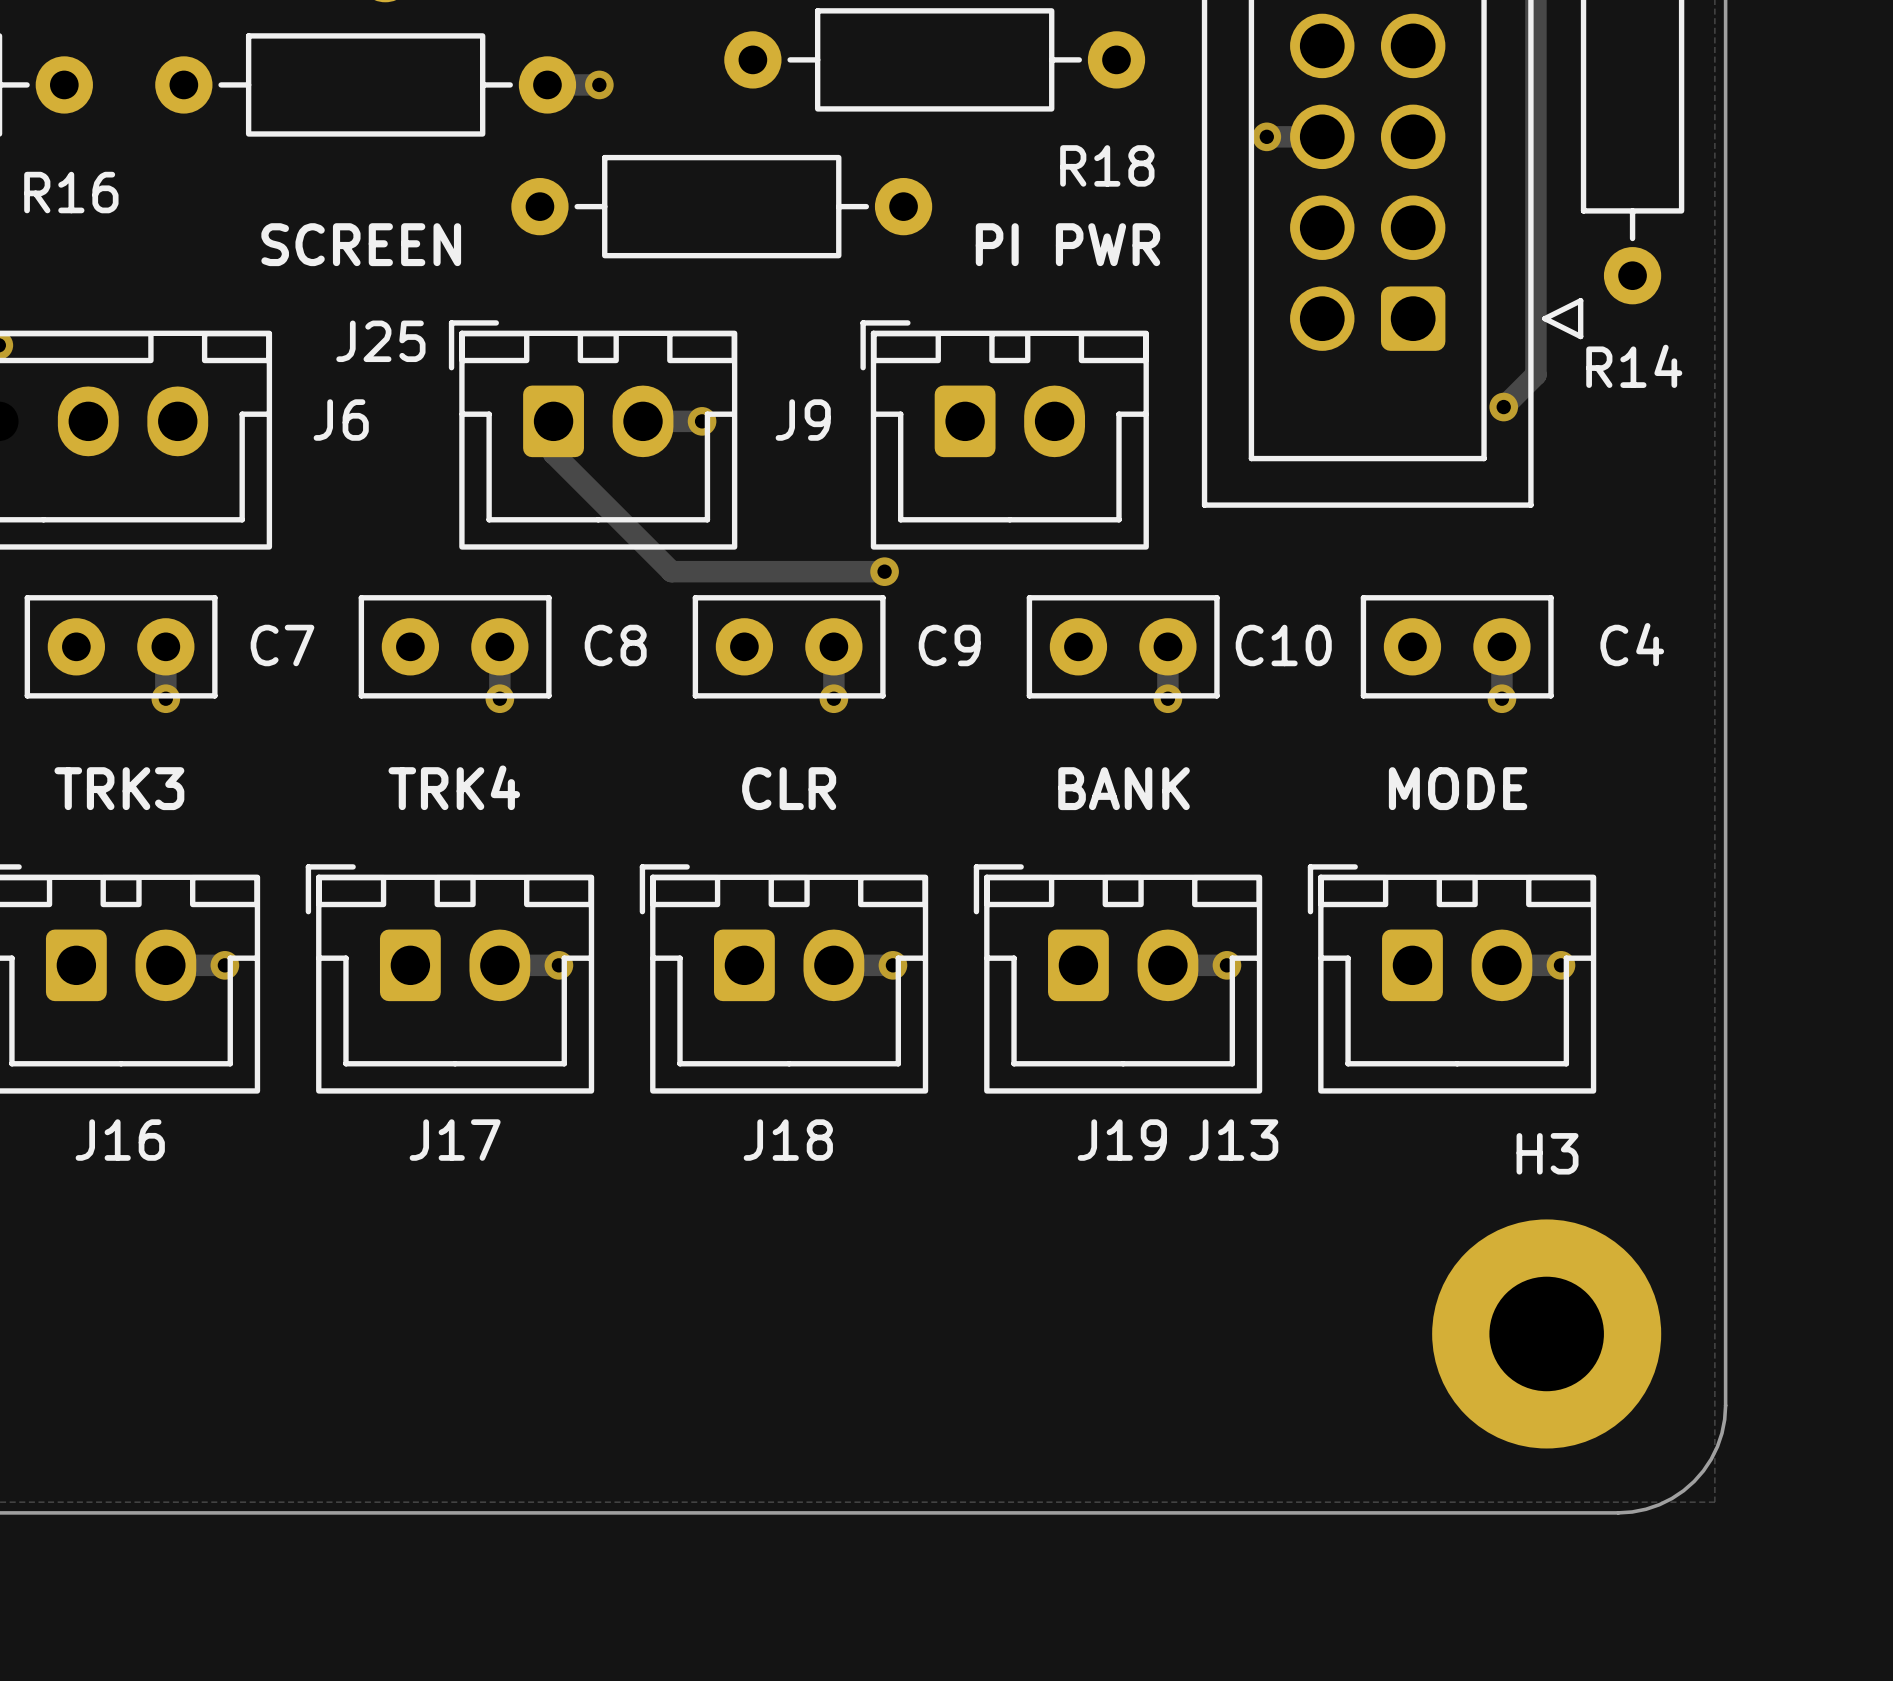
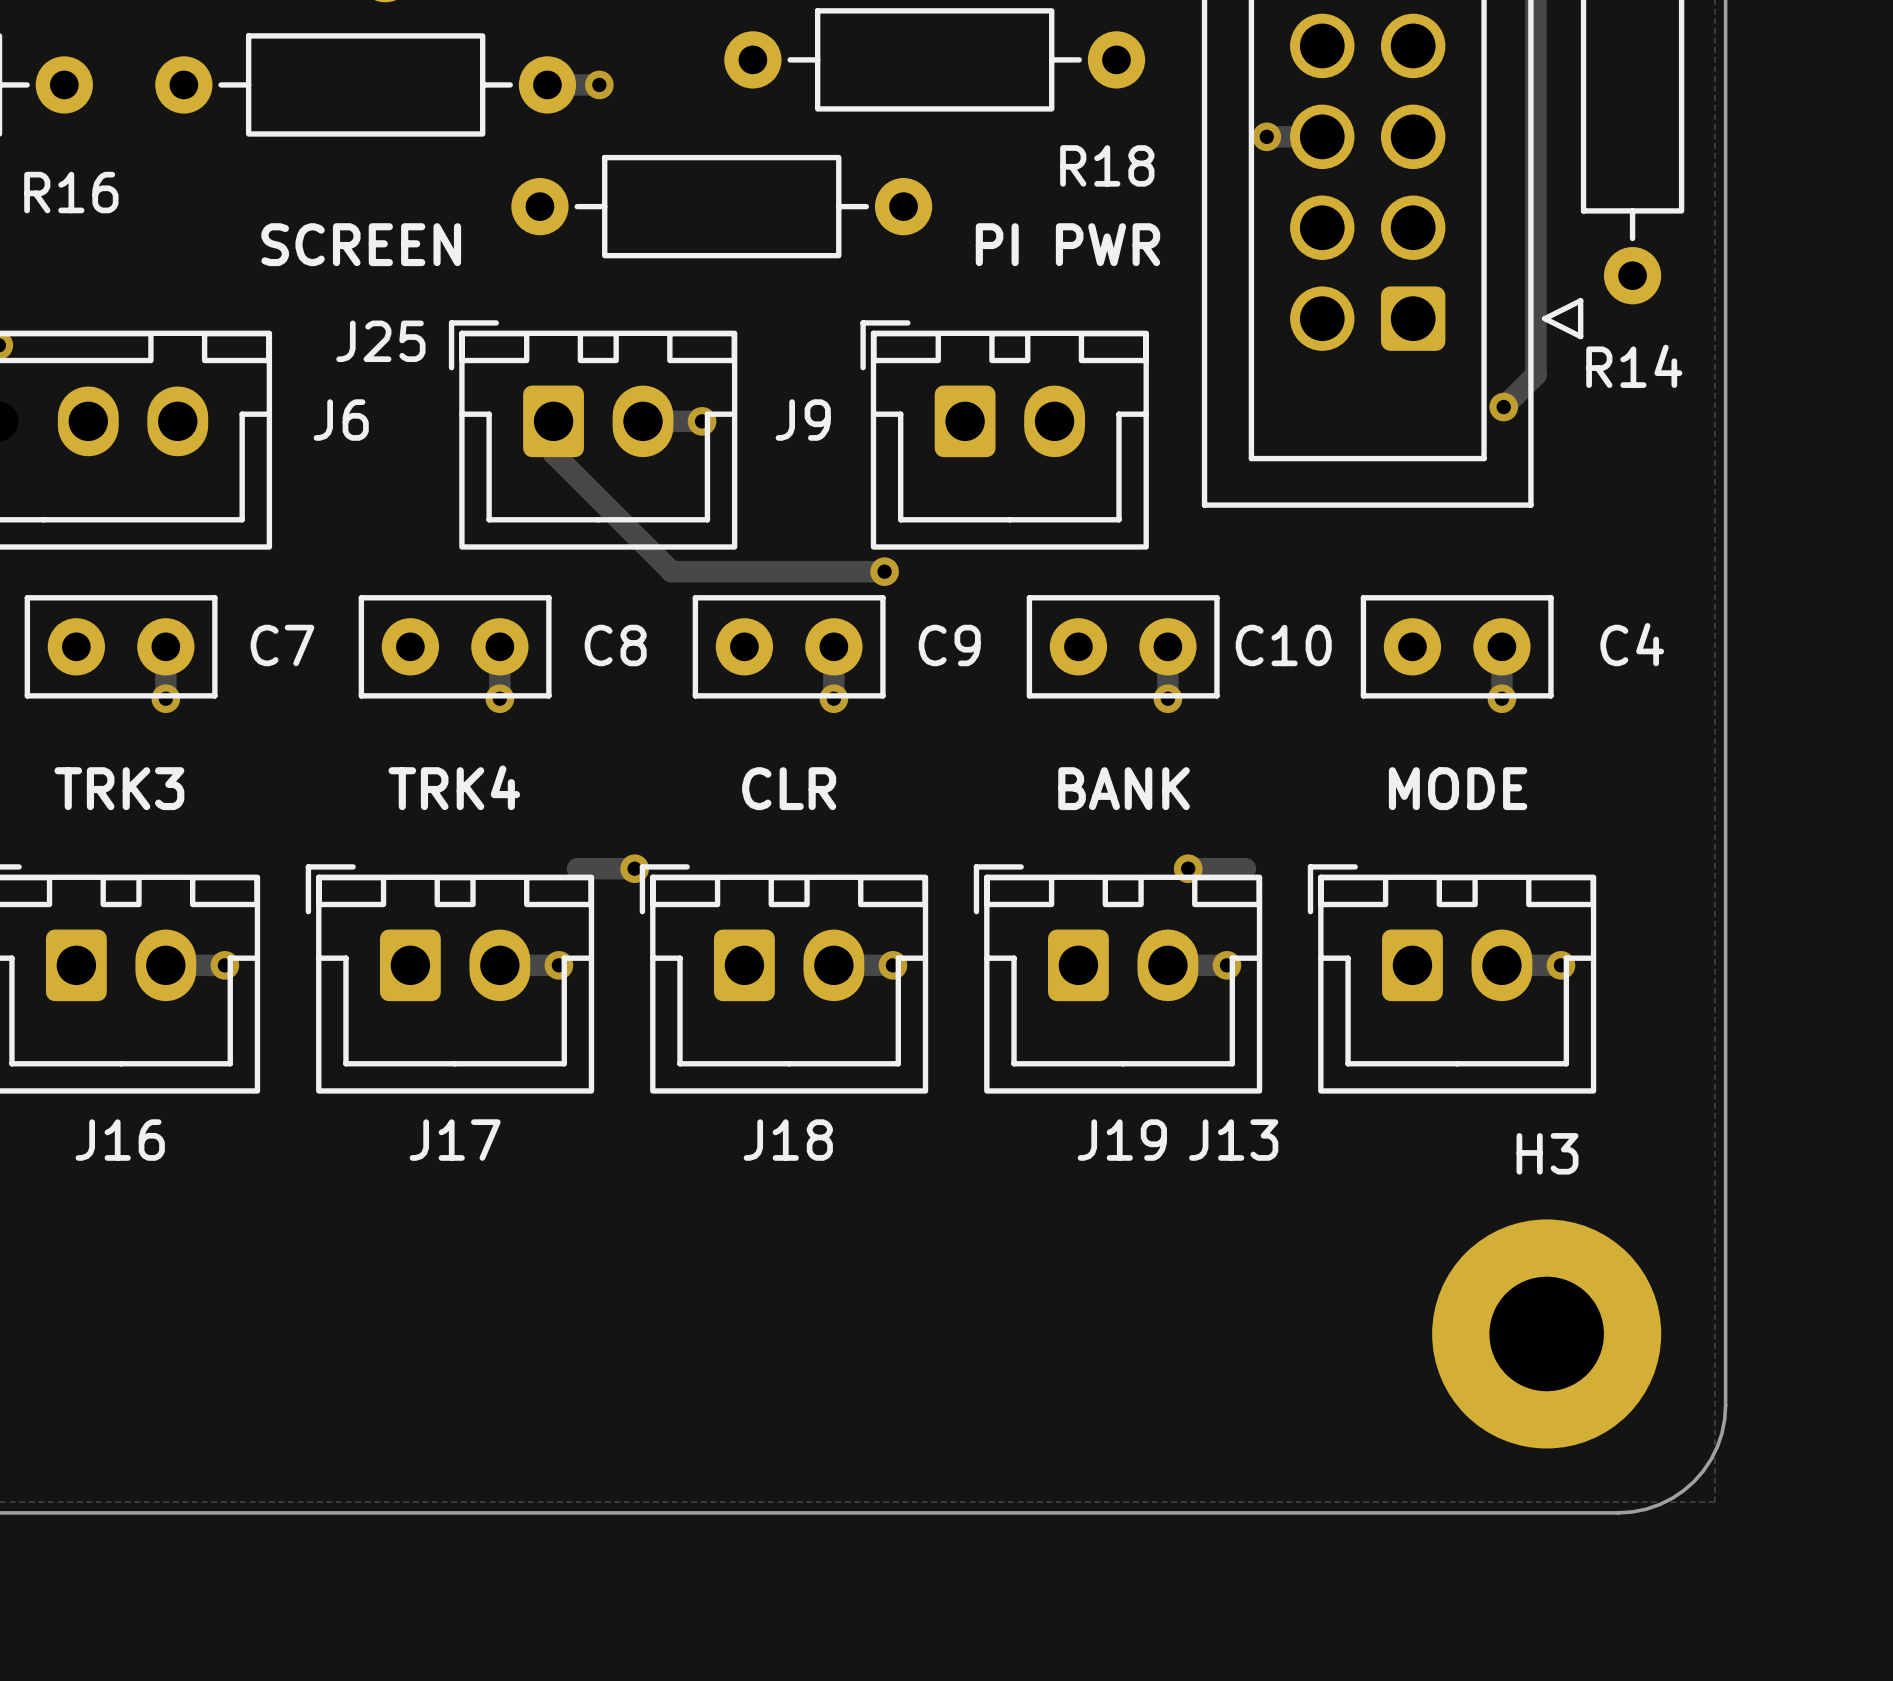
track: none -> (577, 868) (634, 868)
via: none -> (634, 868)
track: none -> (1188, 868) (1245, 868)
via: none -> (1188, 868)

